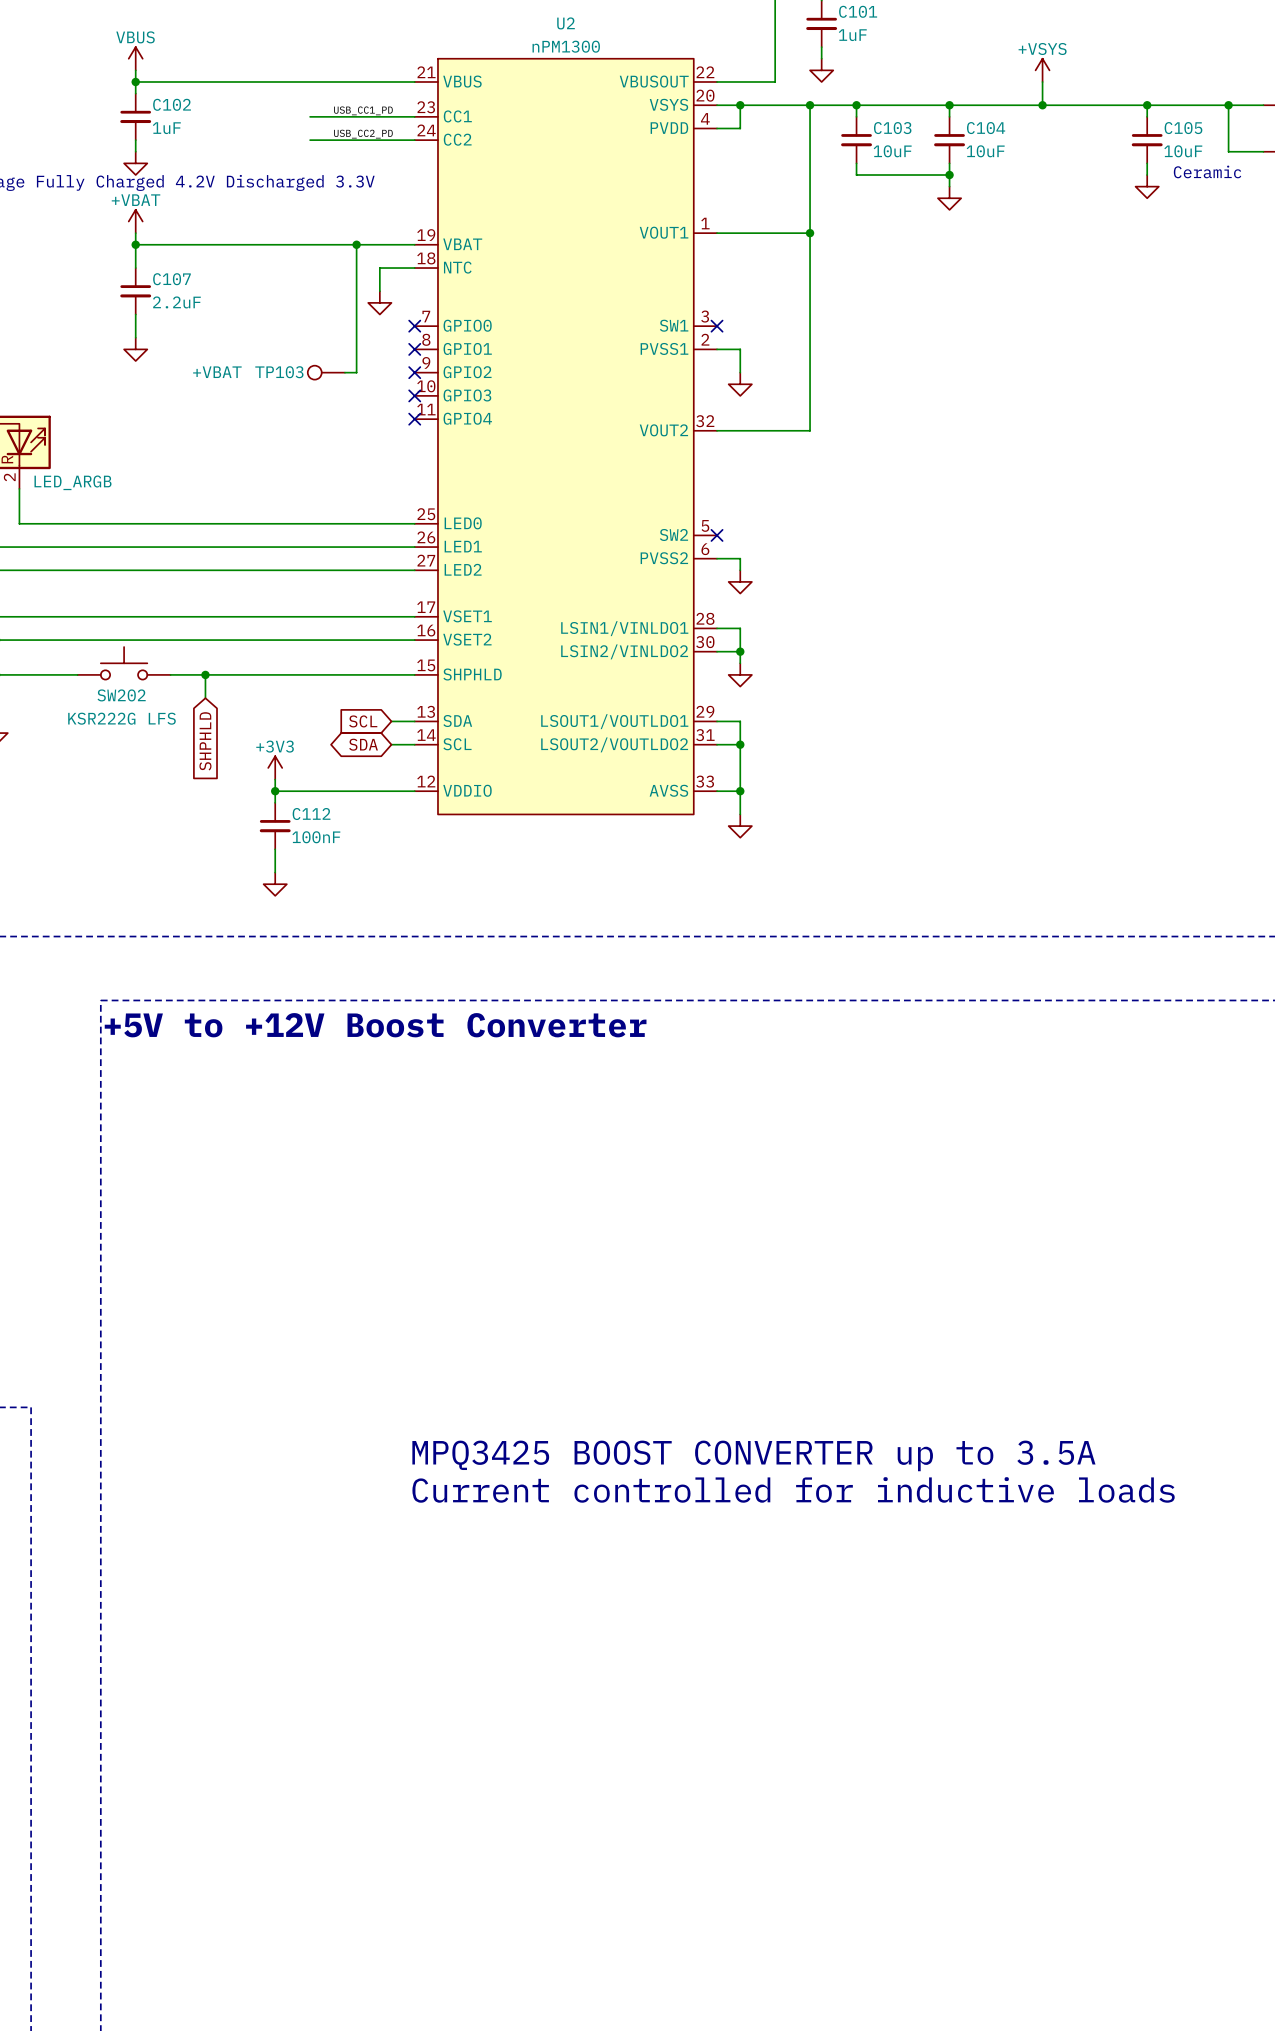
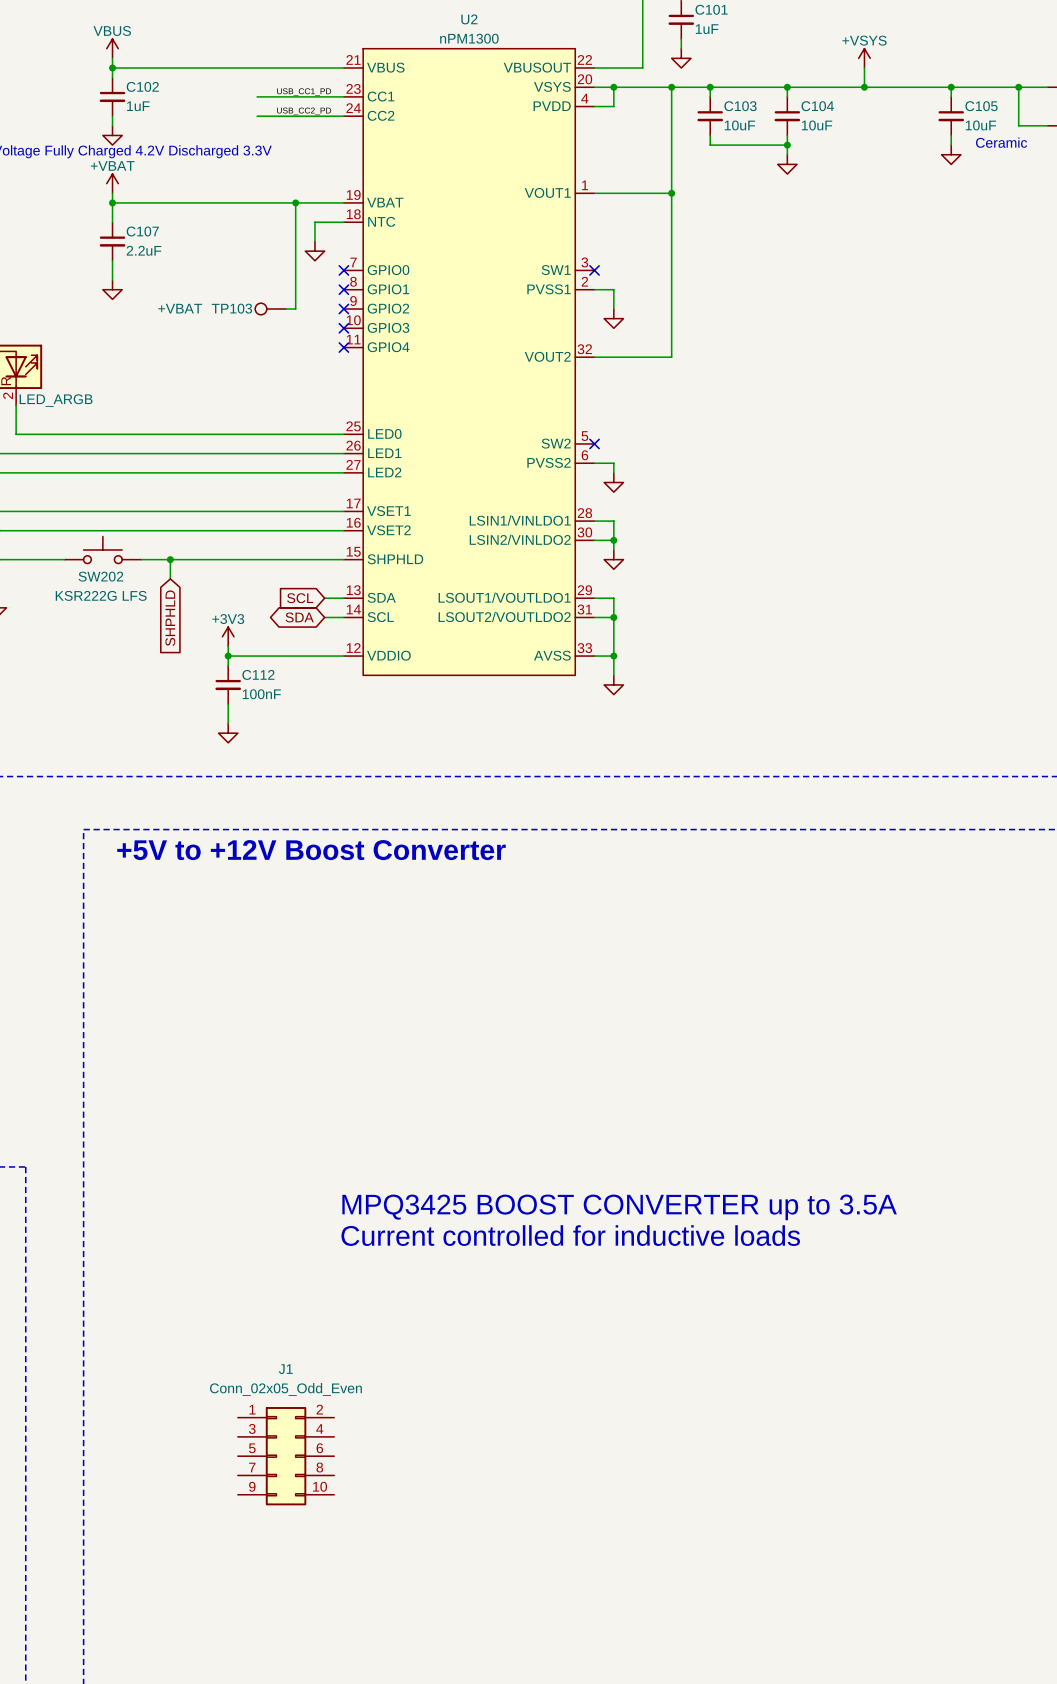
J1: none -> Conn_02x05_Odd_Even (286, 1456)

